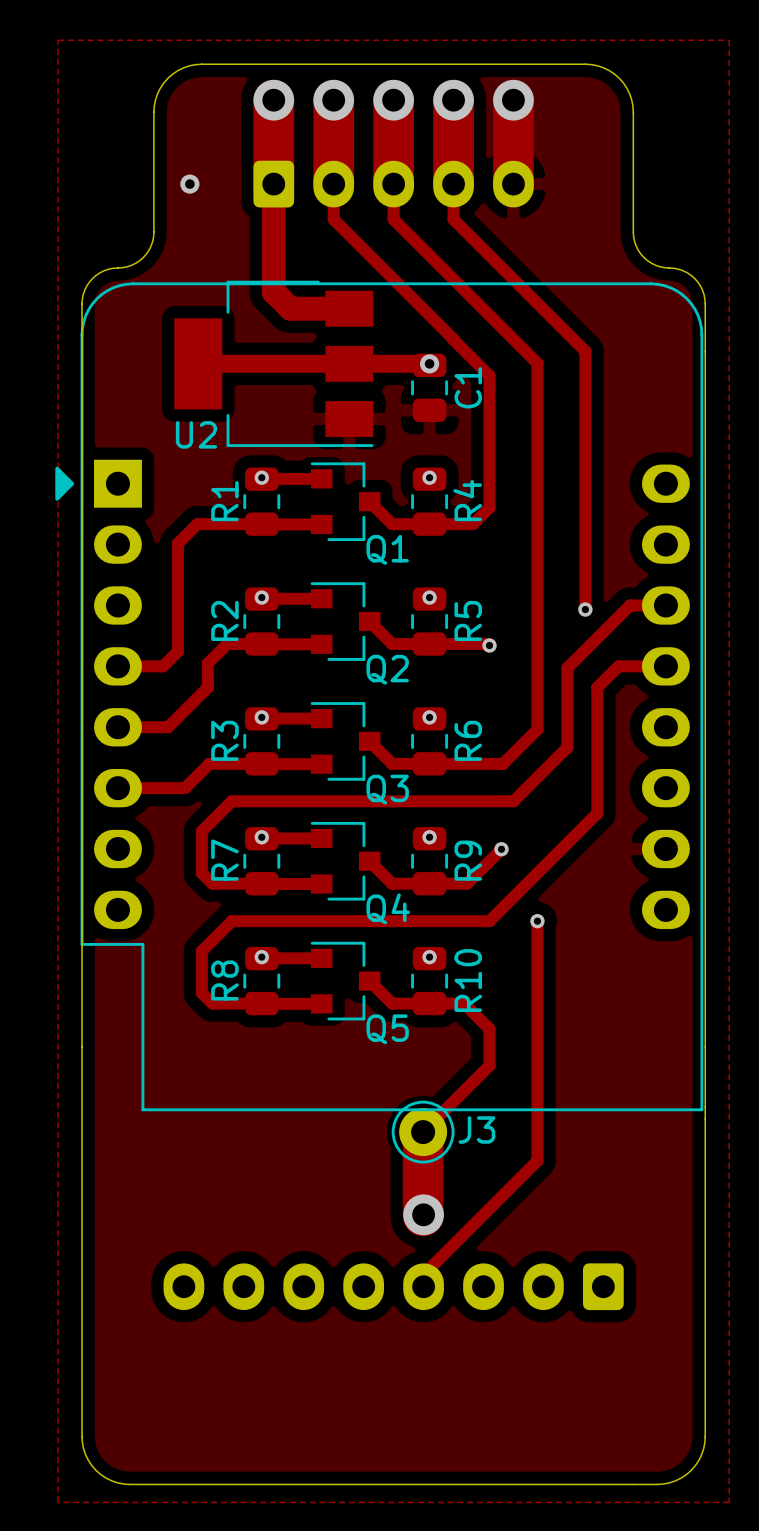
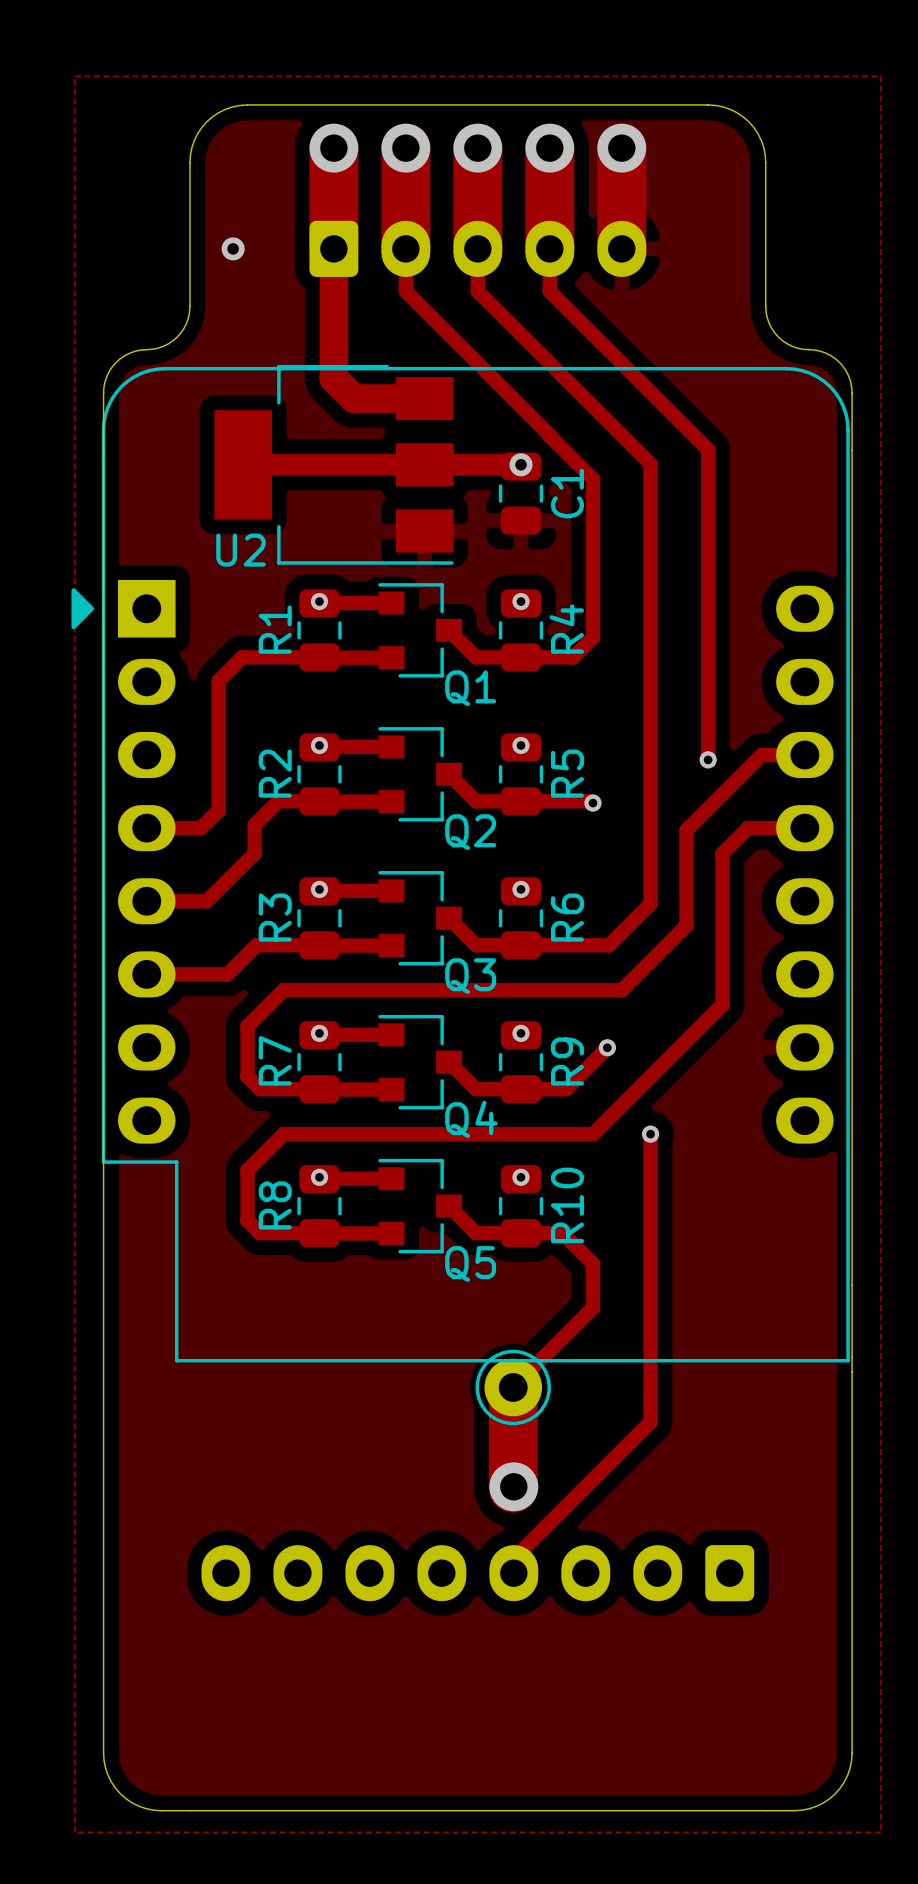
J3 name: J3 (476, 1130) -> none

